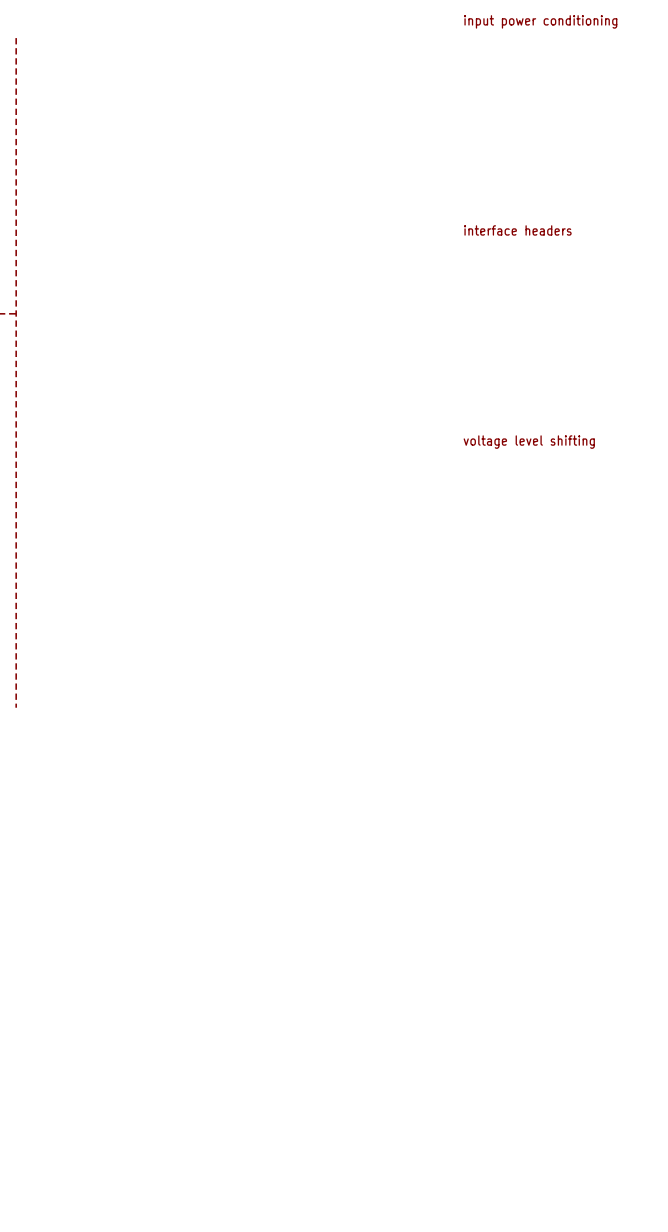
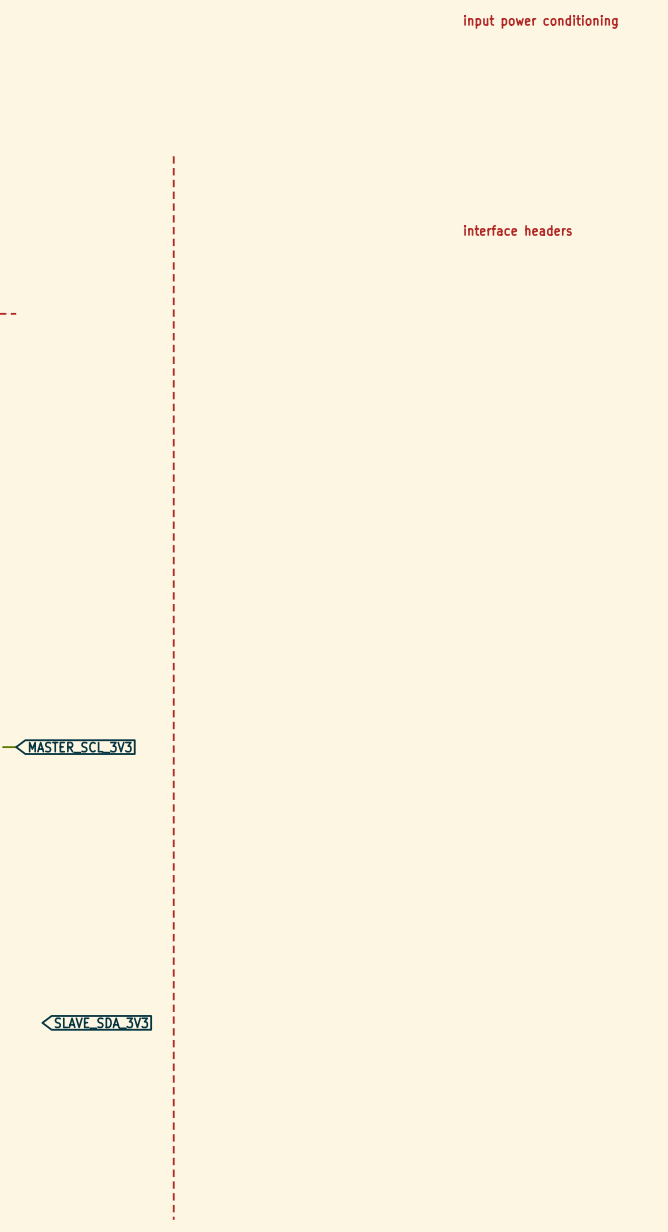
line: (16, 38) (16, 707) -> none
line: none -> (173, 156) (173, 1219)
text: voltage level shifting (529, 442) -> none
wire: none -> (3, 747) (16, 747)
global label: none -> MASTER_SCL_3V3 (80, 747)
global label: none -> SLAVE_SDA_3V3 (101, 1023)

